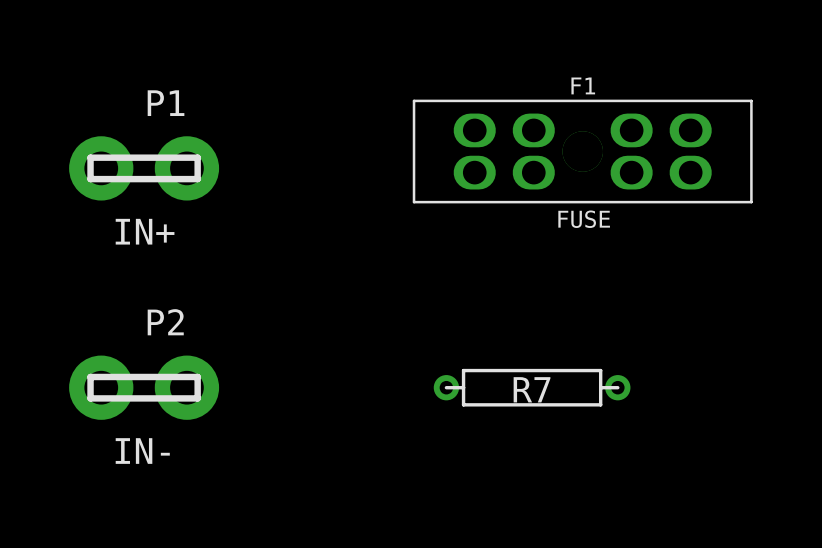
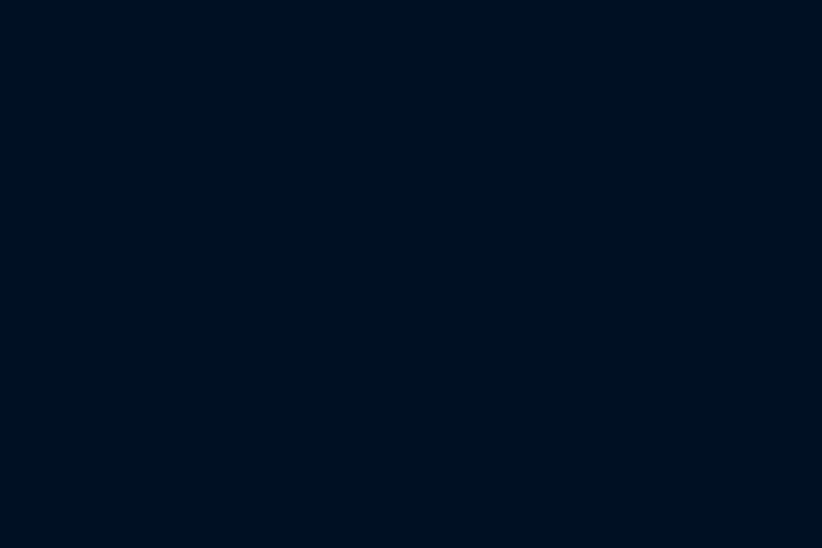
F1: FUSE (582, 151) -> none
P1: IN+ (144, 168) -> none
P2: IN- (144, 387) -> none
R7: (532, 387) -> none

